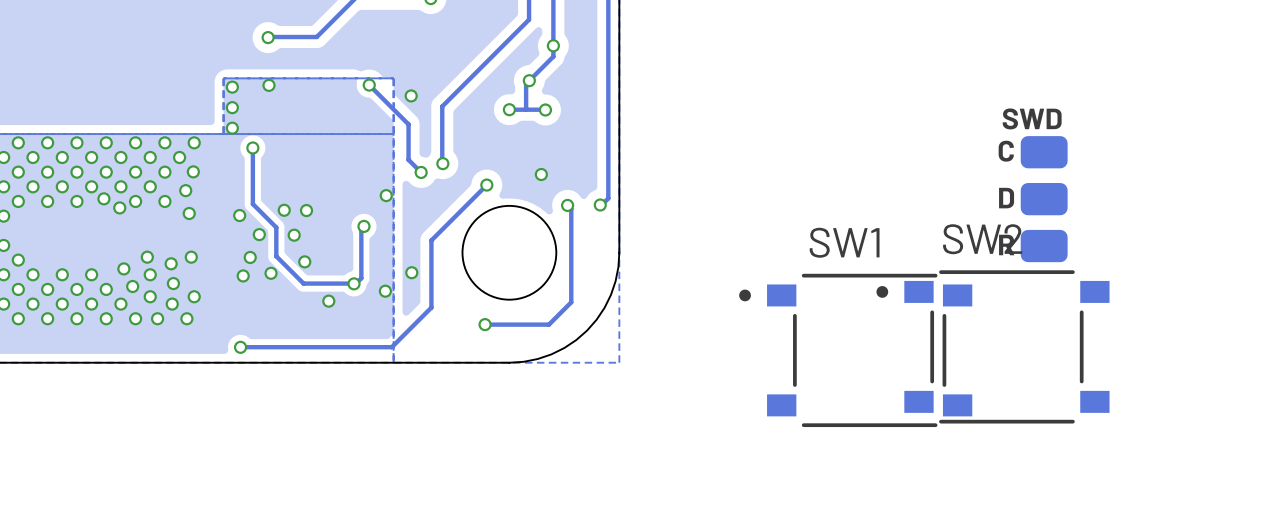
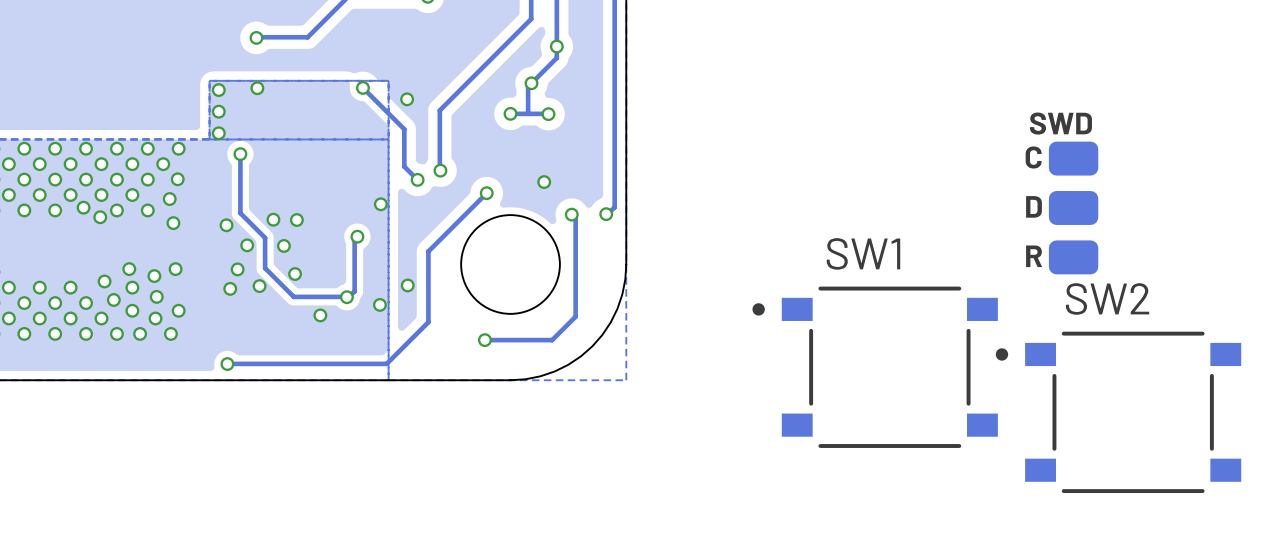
SW2 position: (993, 346) -> (1118, 412)

